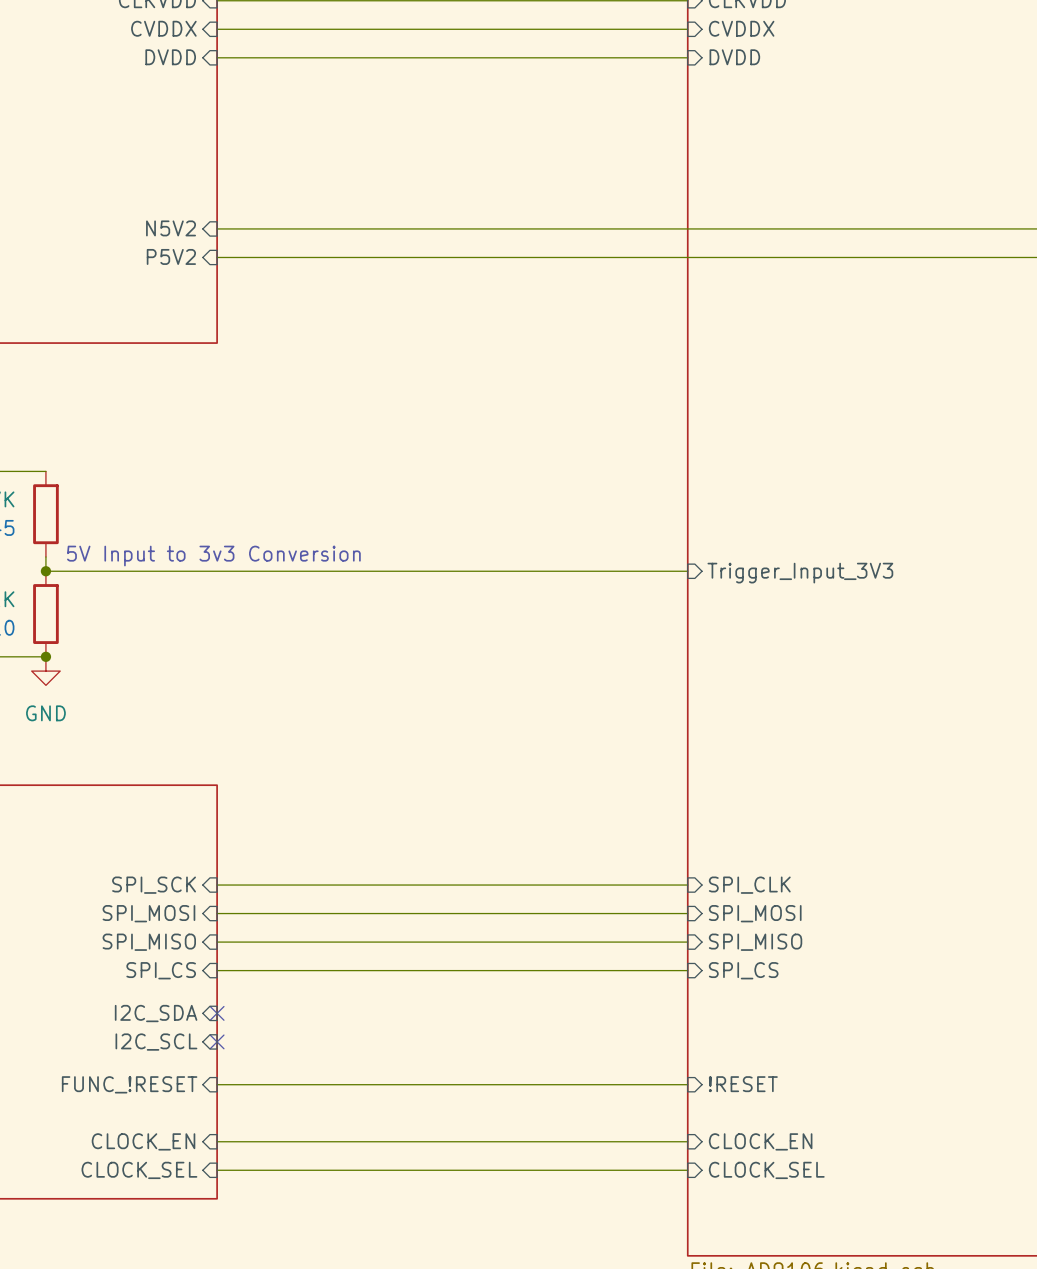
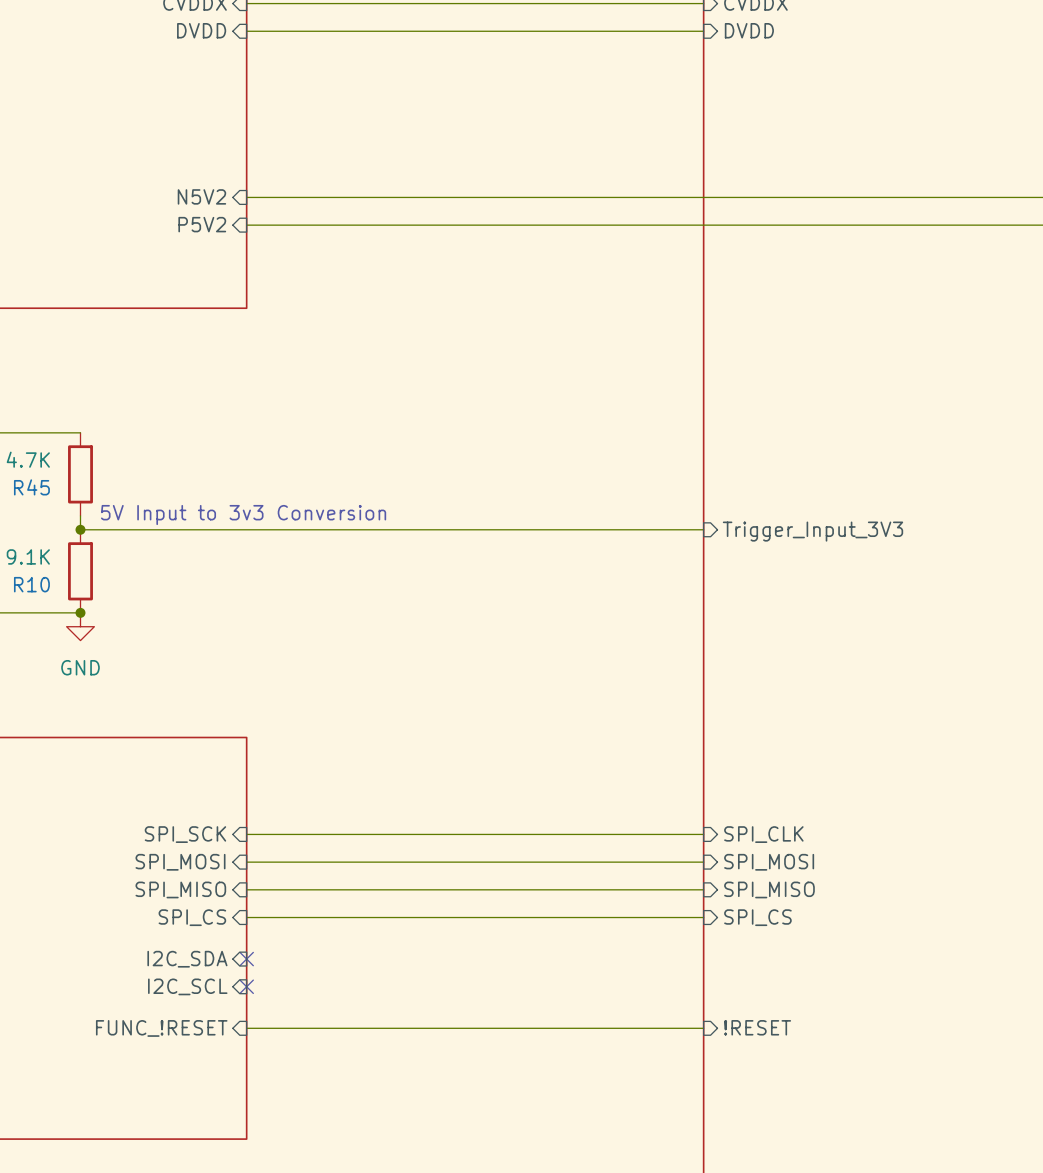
sheet pin: CLOCK_EN (143, 1141) -> none
wire: (217, 1141) (687, 1141) -> none
sheet pin: CLOCK_EN (760, 1141) -> none
sheet pin: CLOCK_SEL (139, 1170) -> none
wire: (217, 1170) (687, 1170) -> none
sheet pin: CLOCK_SEL (766, 1170) -> none

